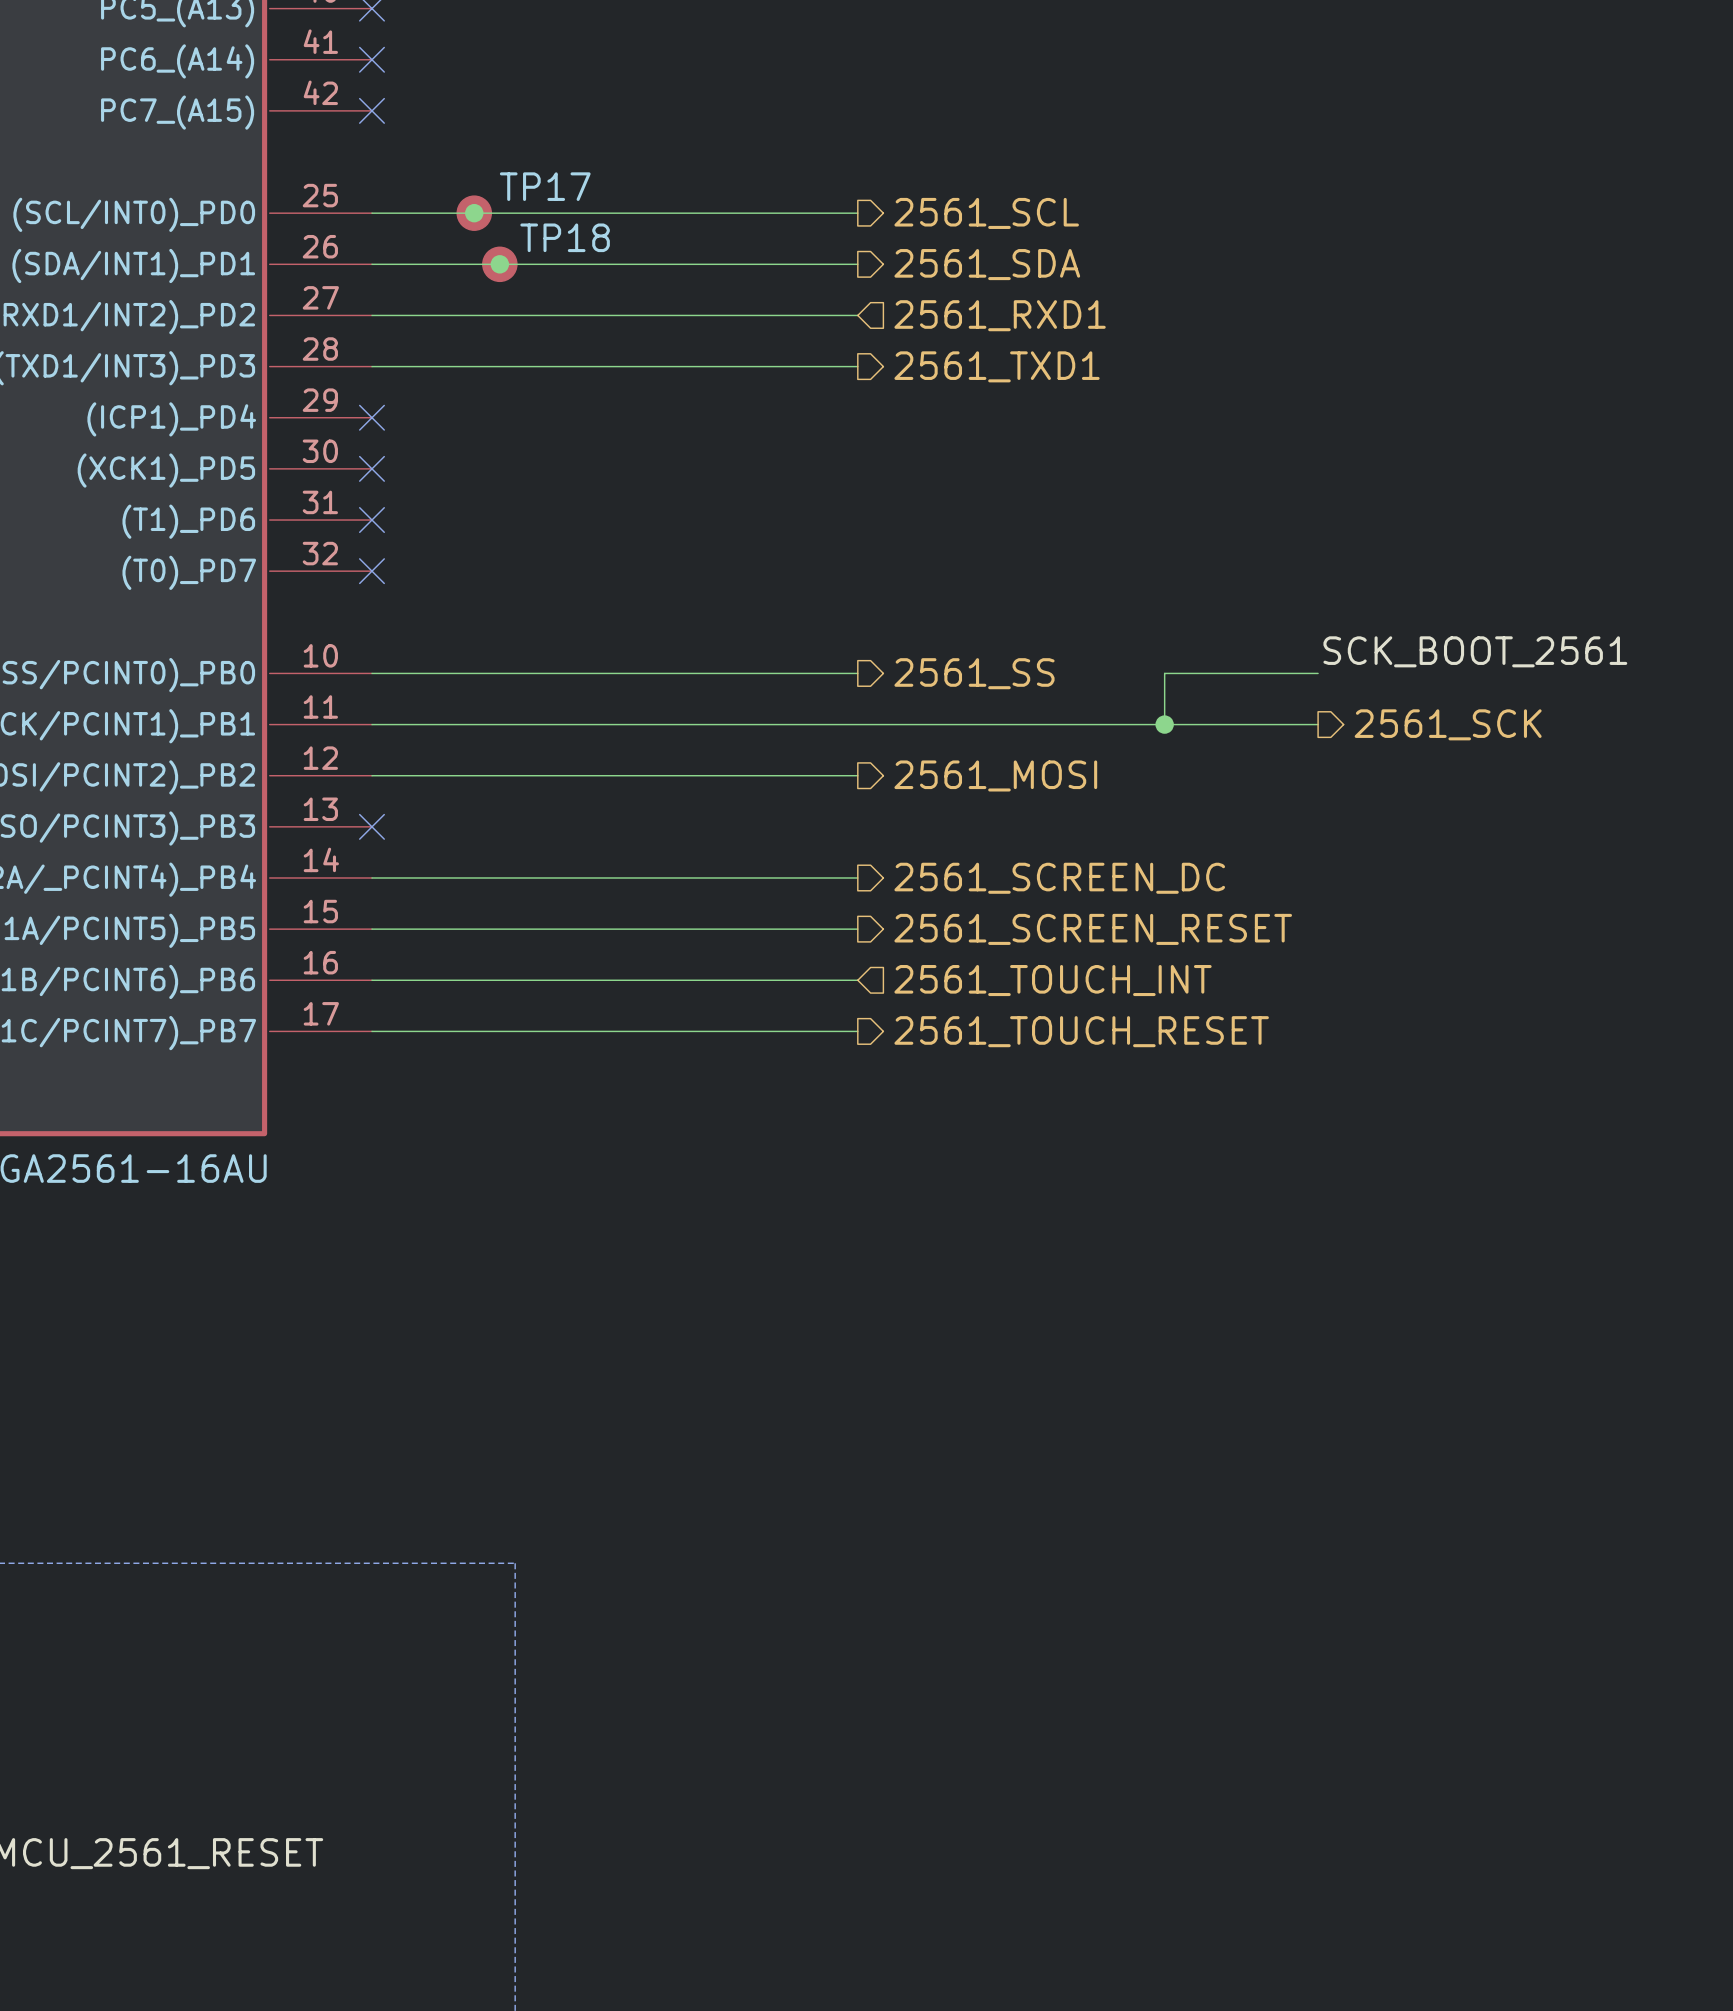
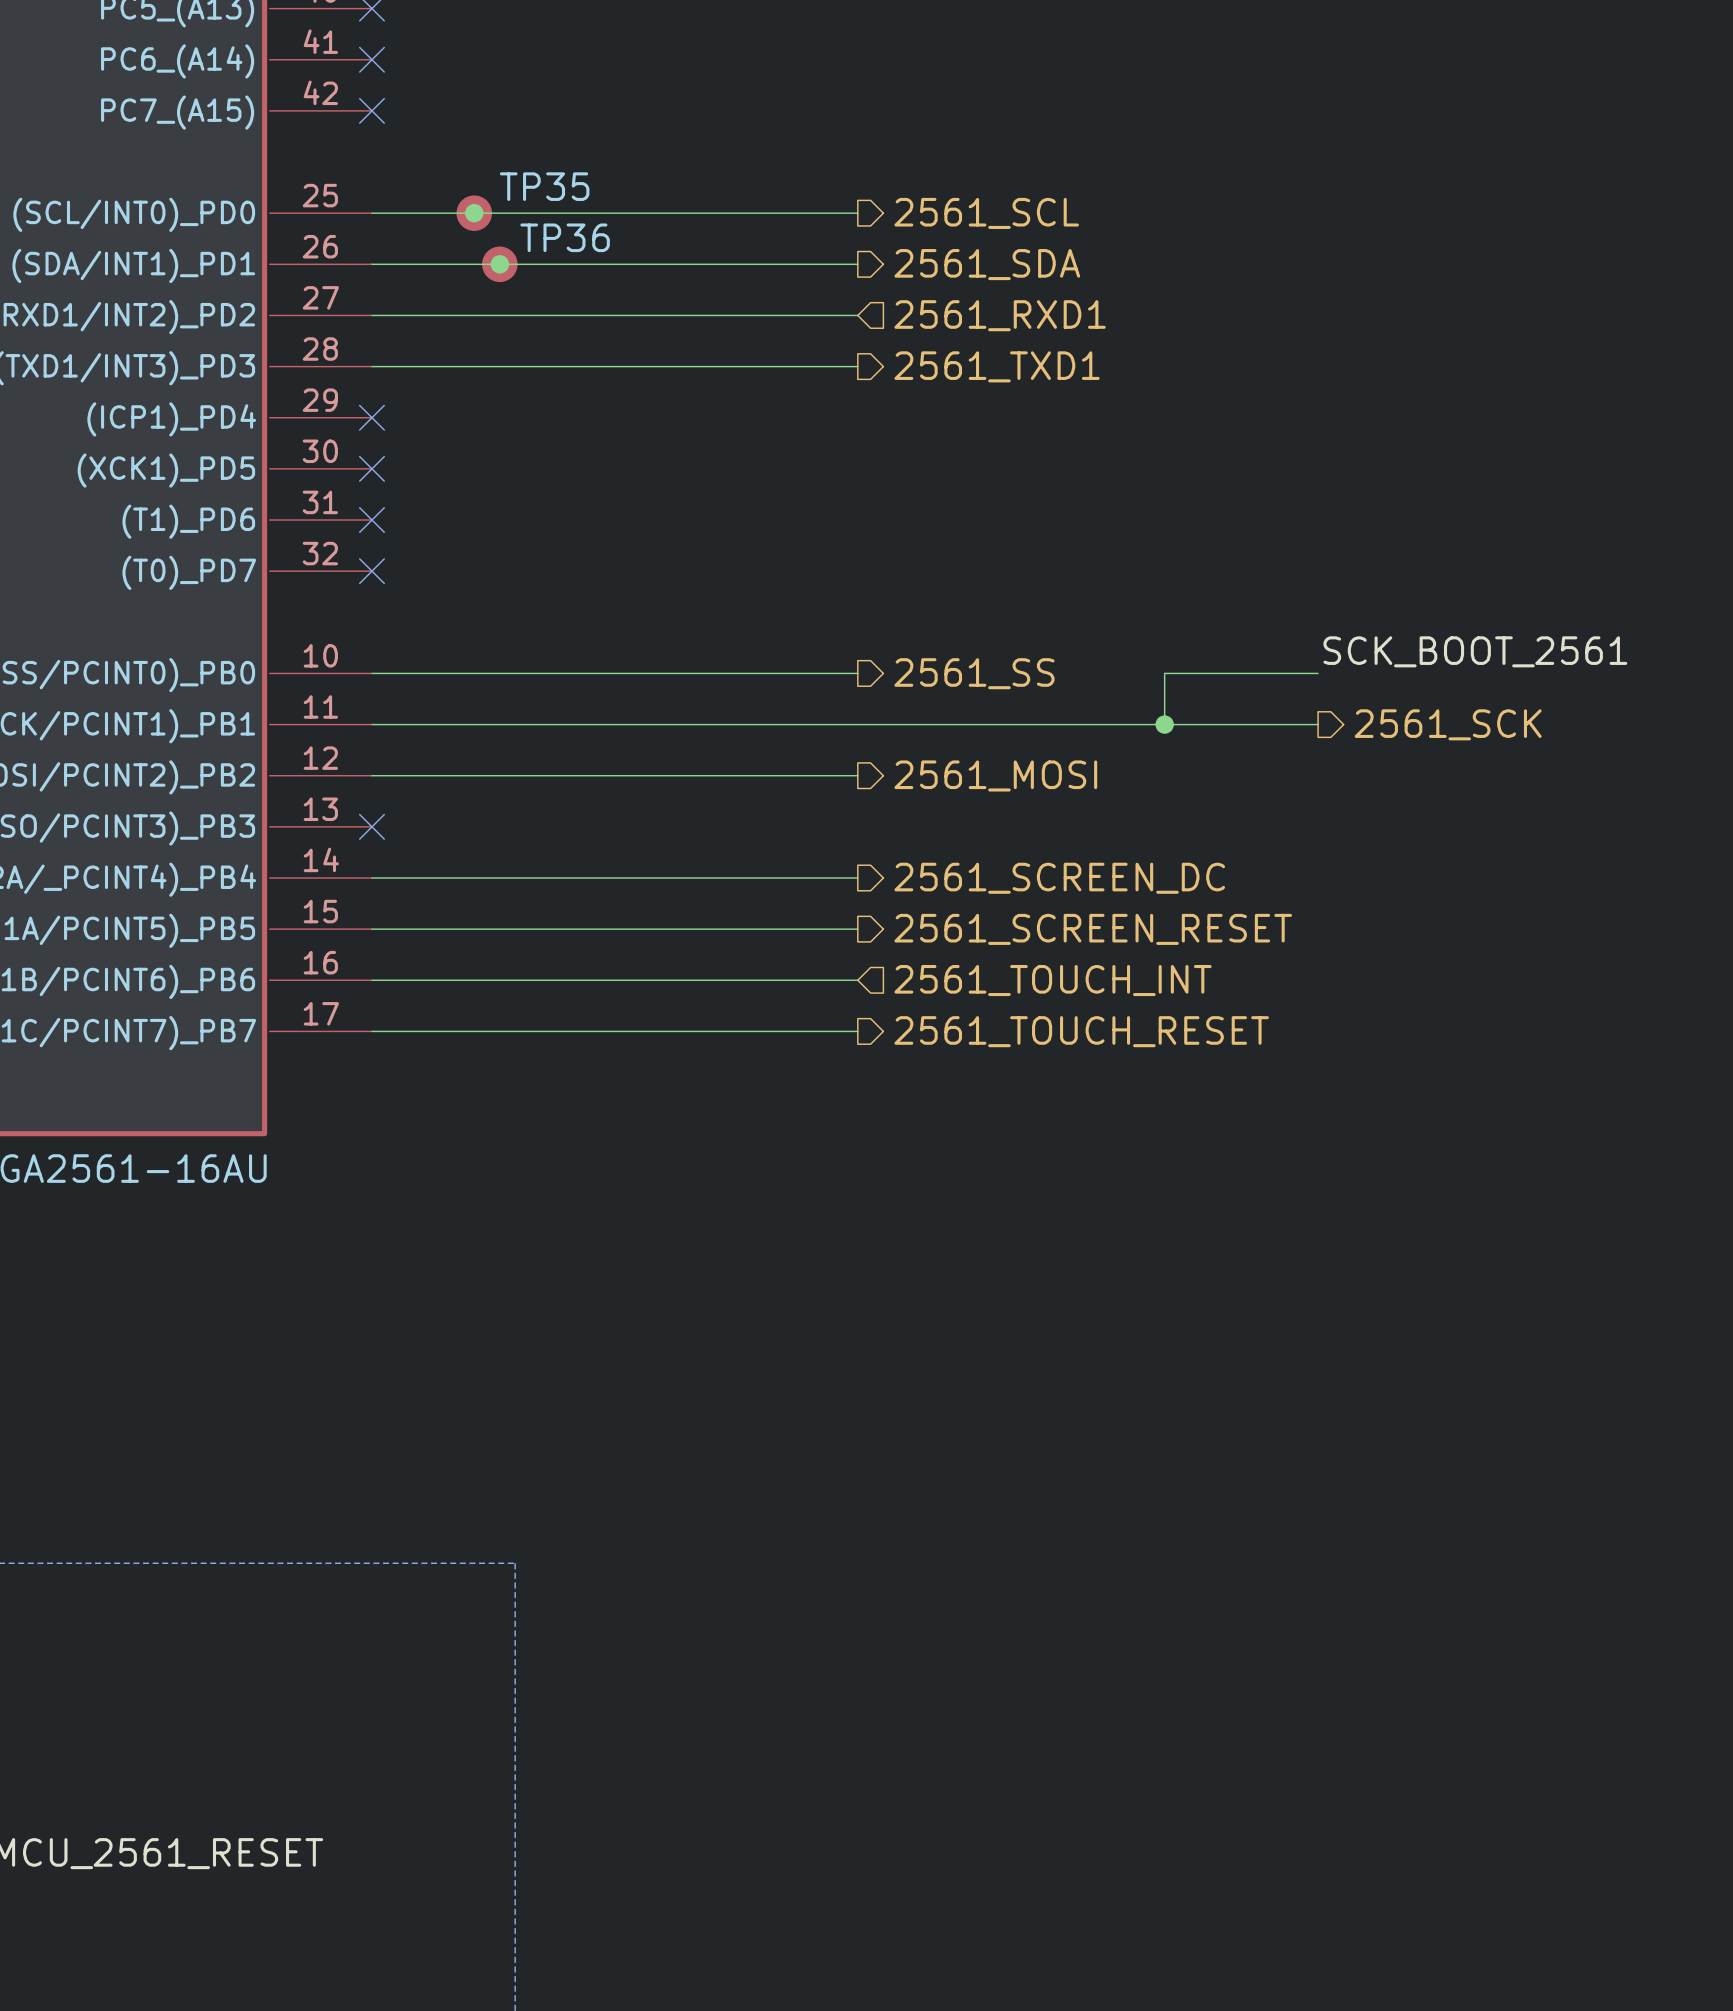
TP17 name: TP17 (545, 186) -> TP35 (544, 186)
TP18 name: TP18 (565, 237) -> TP36 (565, 237)

